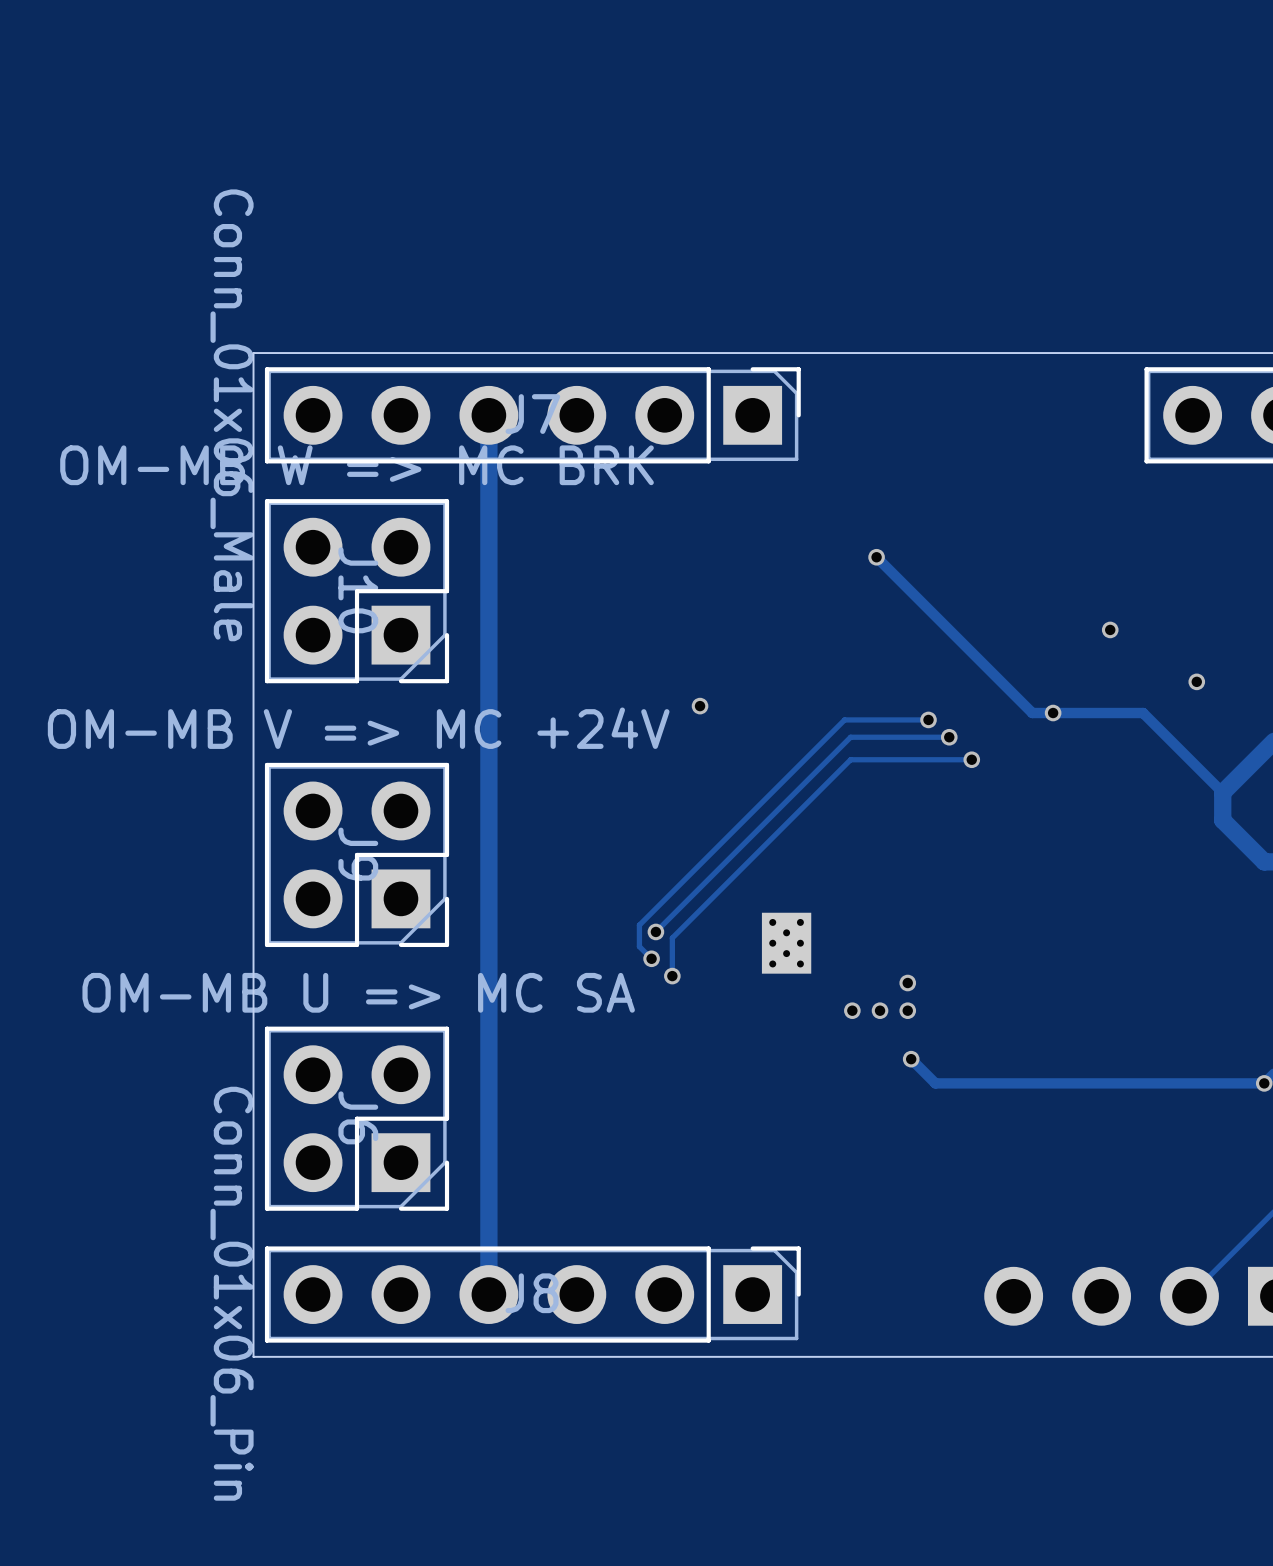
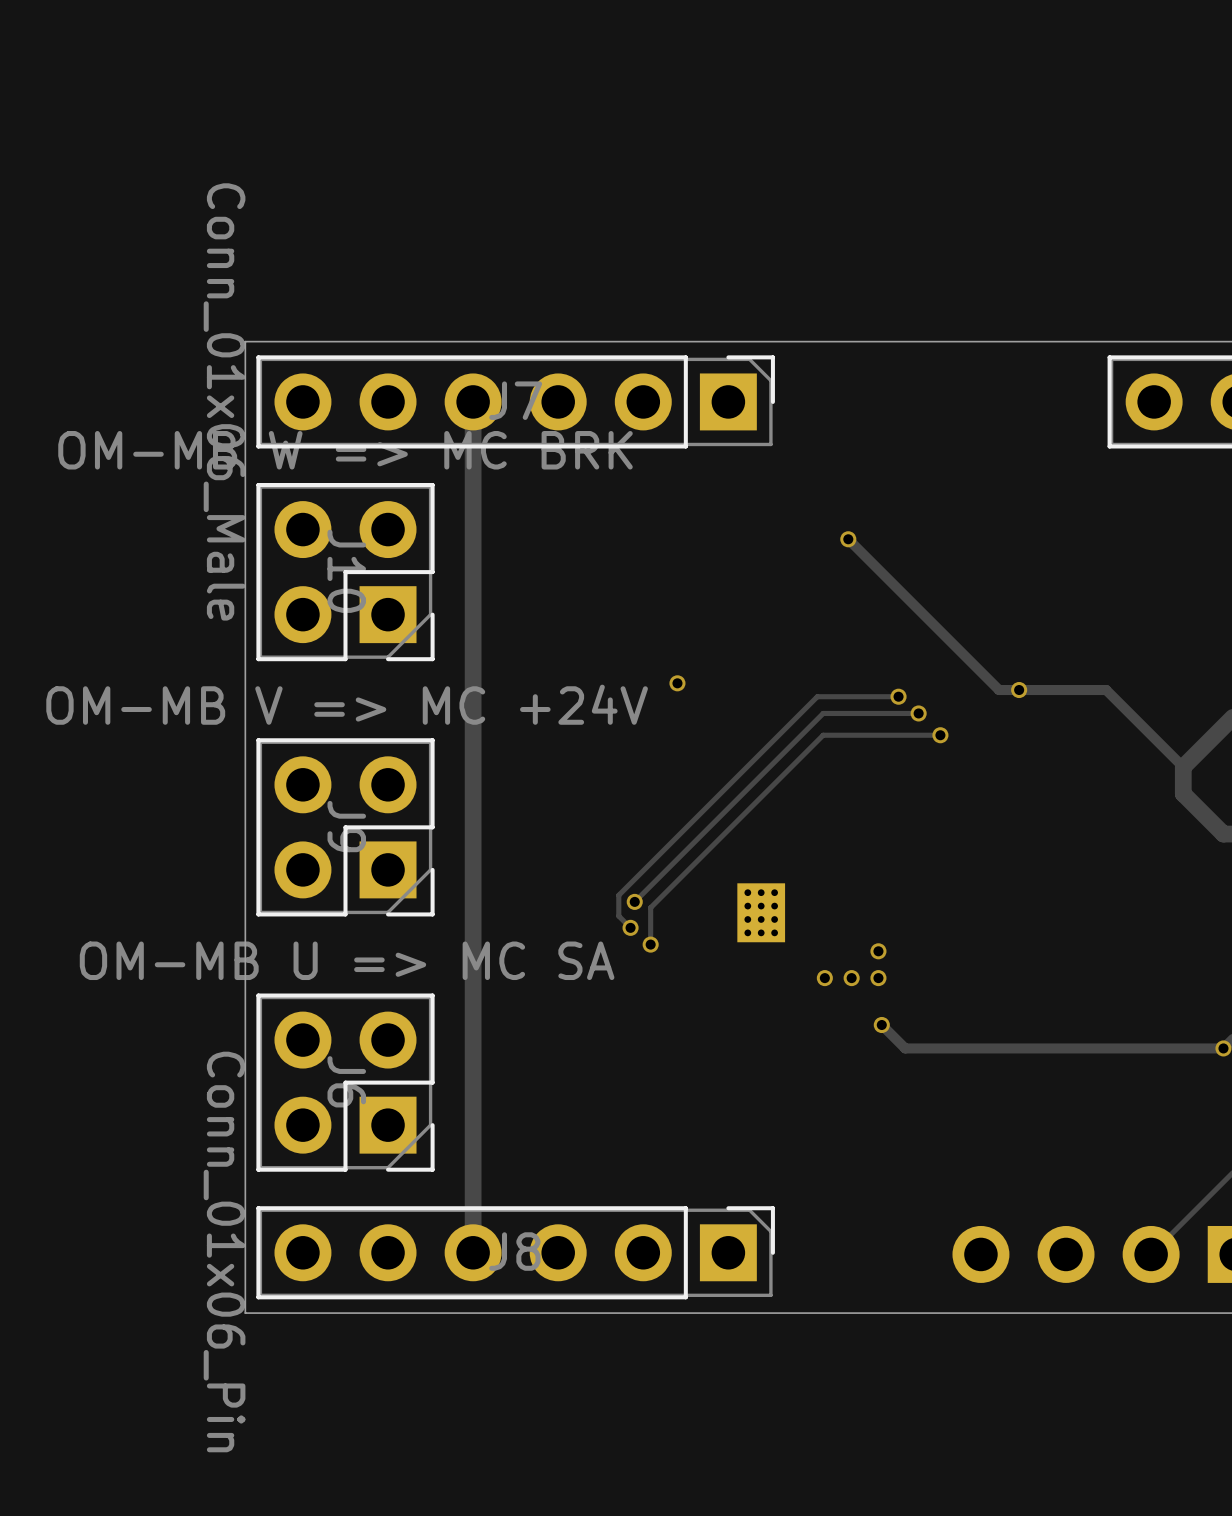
via: (1110, 629) -> none
via: (1196, 681) -> none
part footprint: [761, 912, 812, 974] -> [737, 883, 786, 943]

